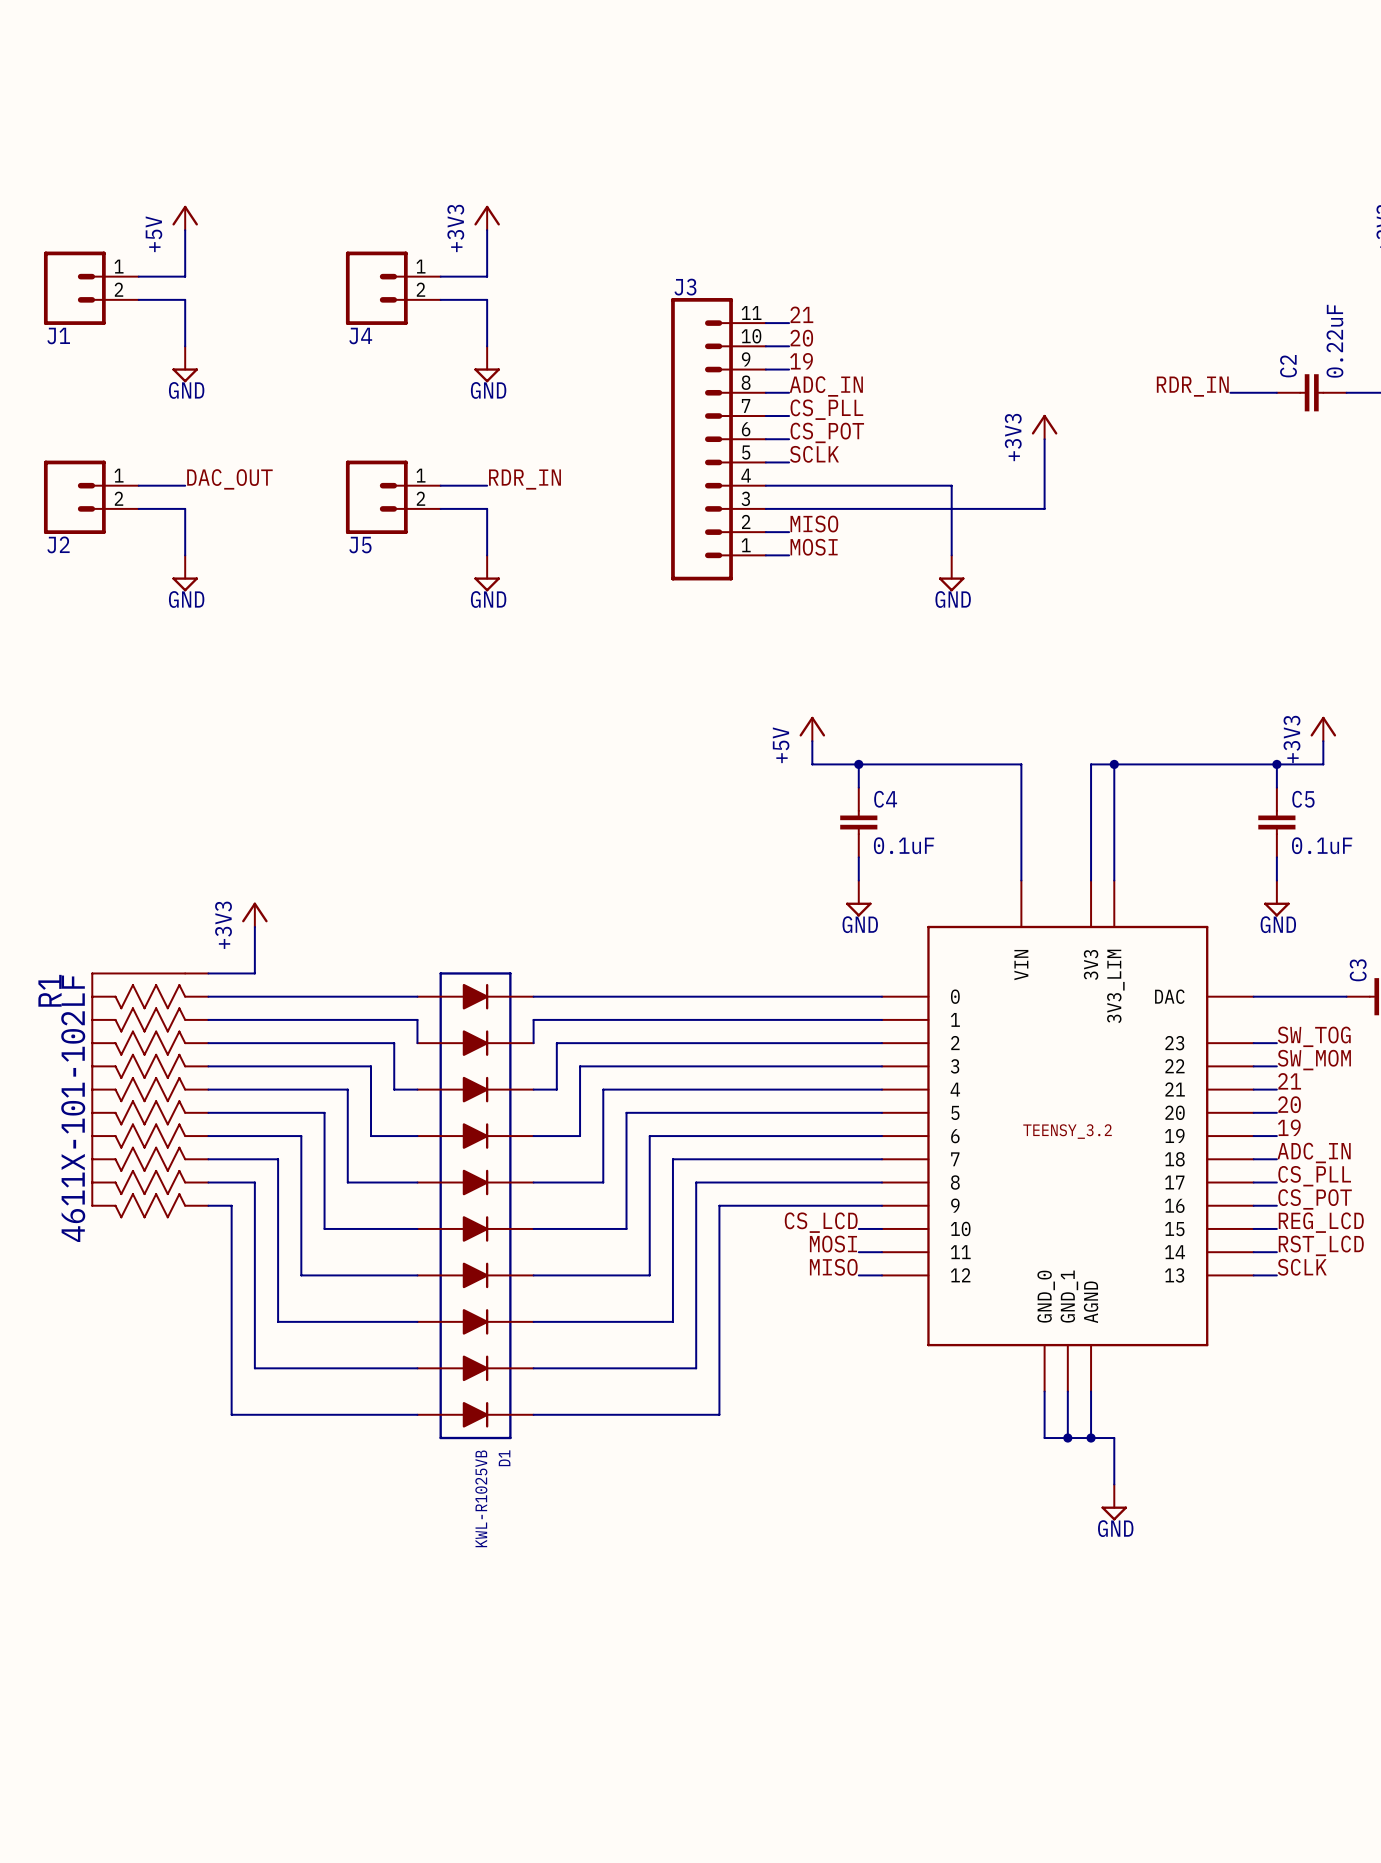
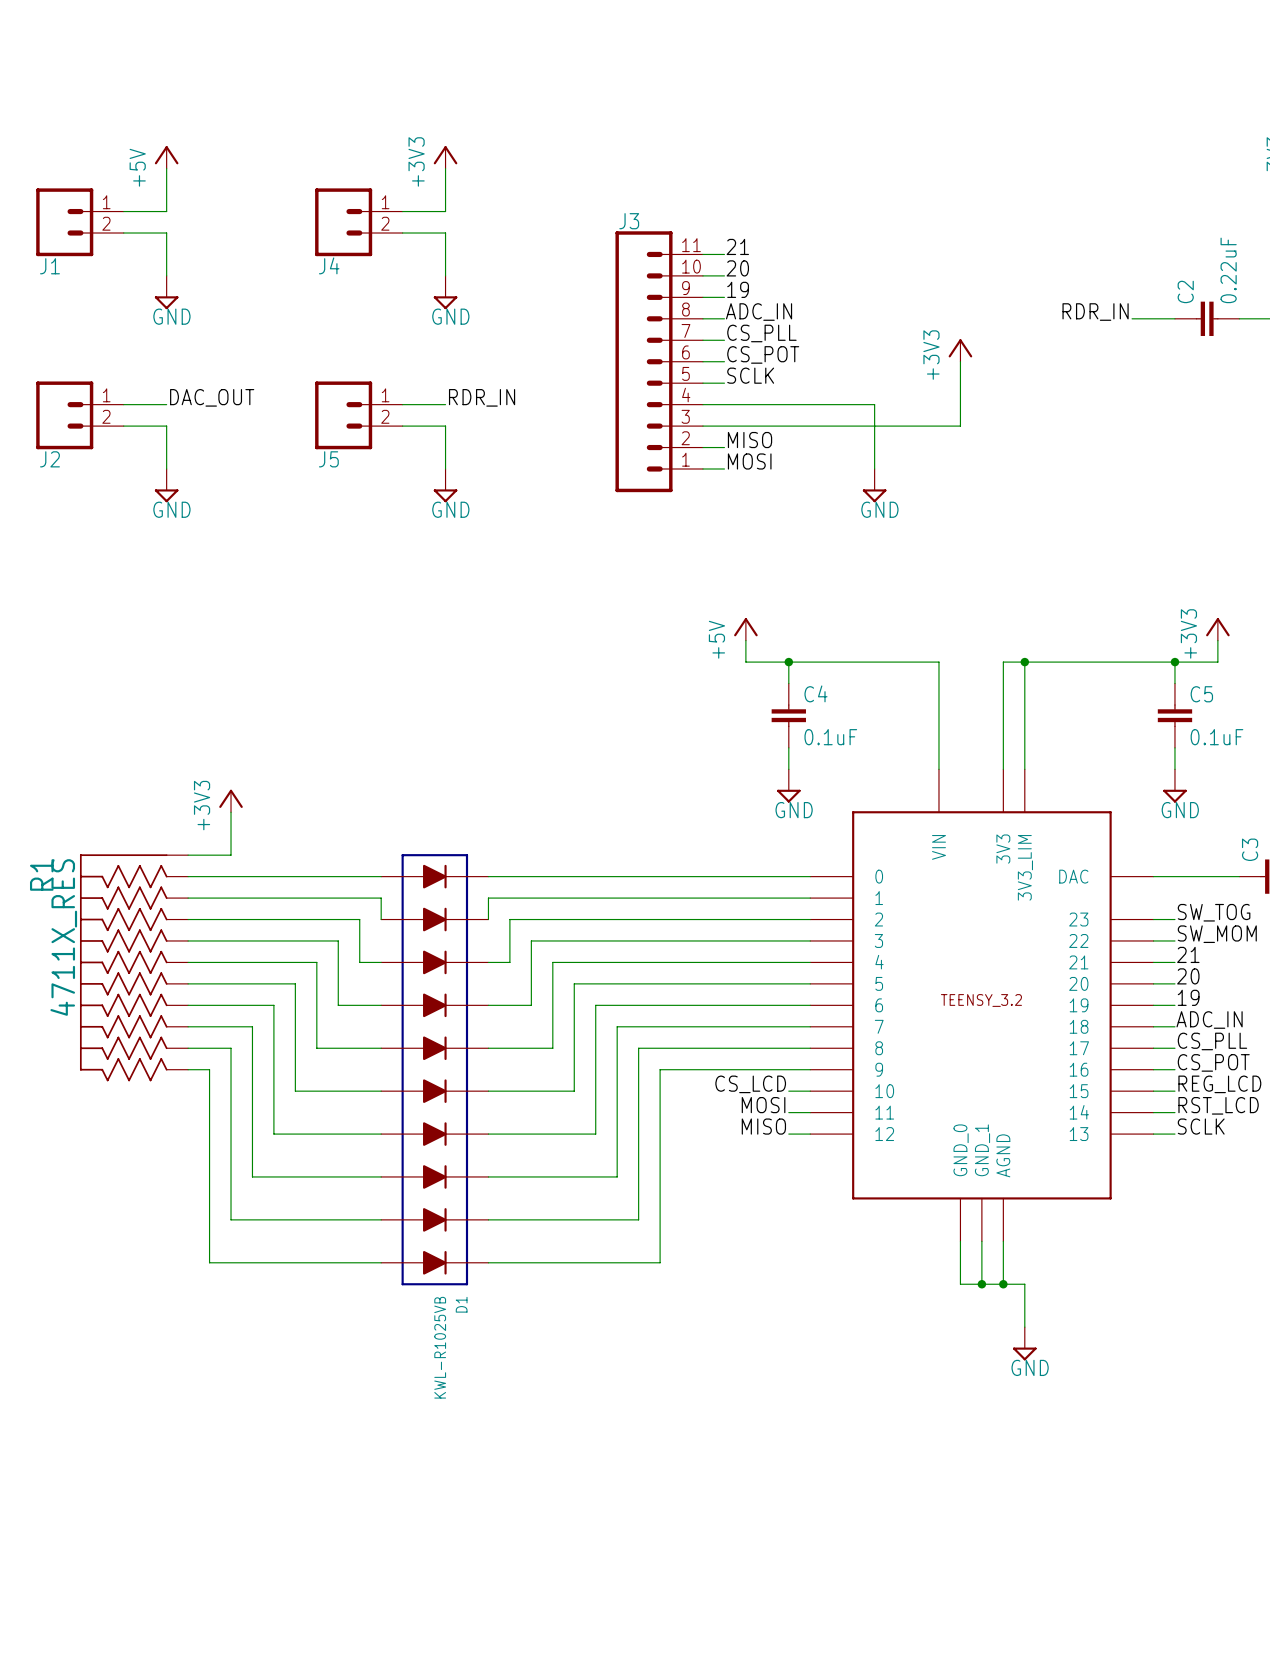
R1 value: 4611X-101-102LF (73, 1108) -> 4711X_RES (63, 937)

